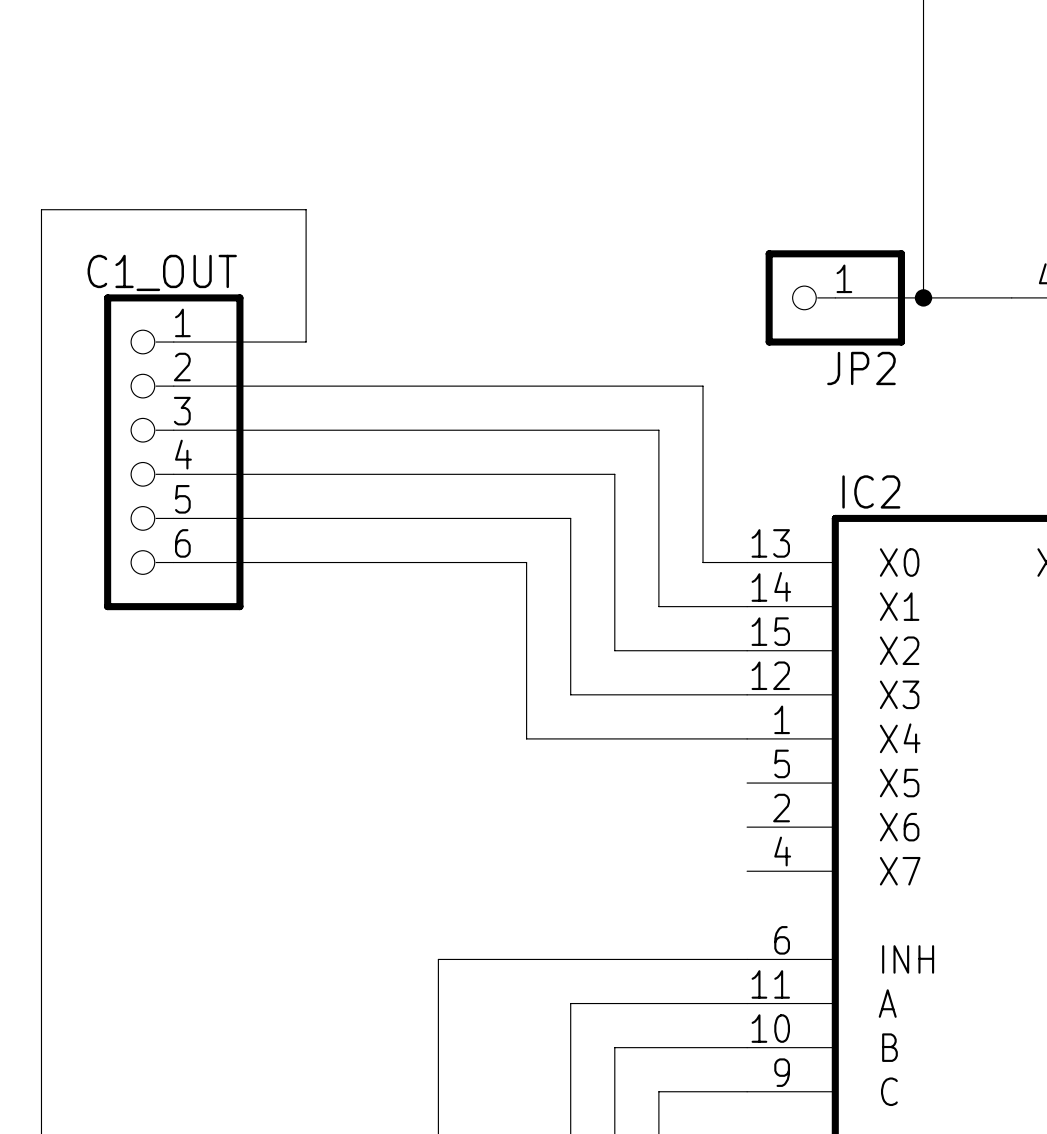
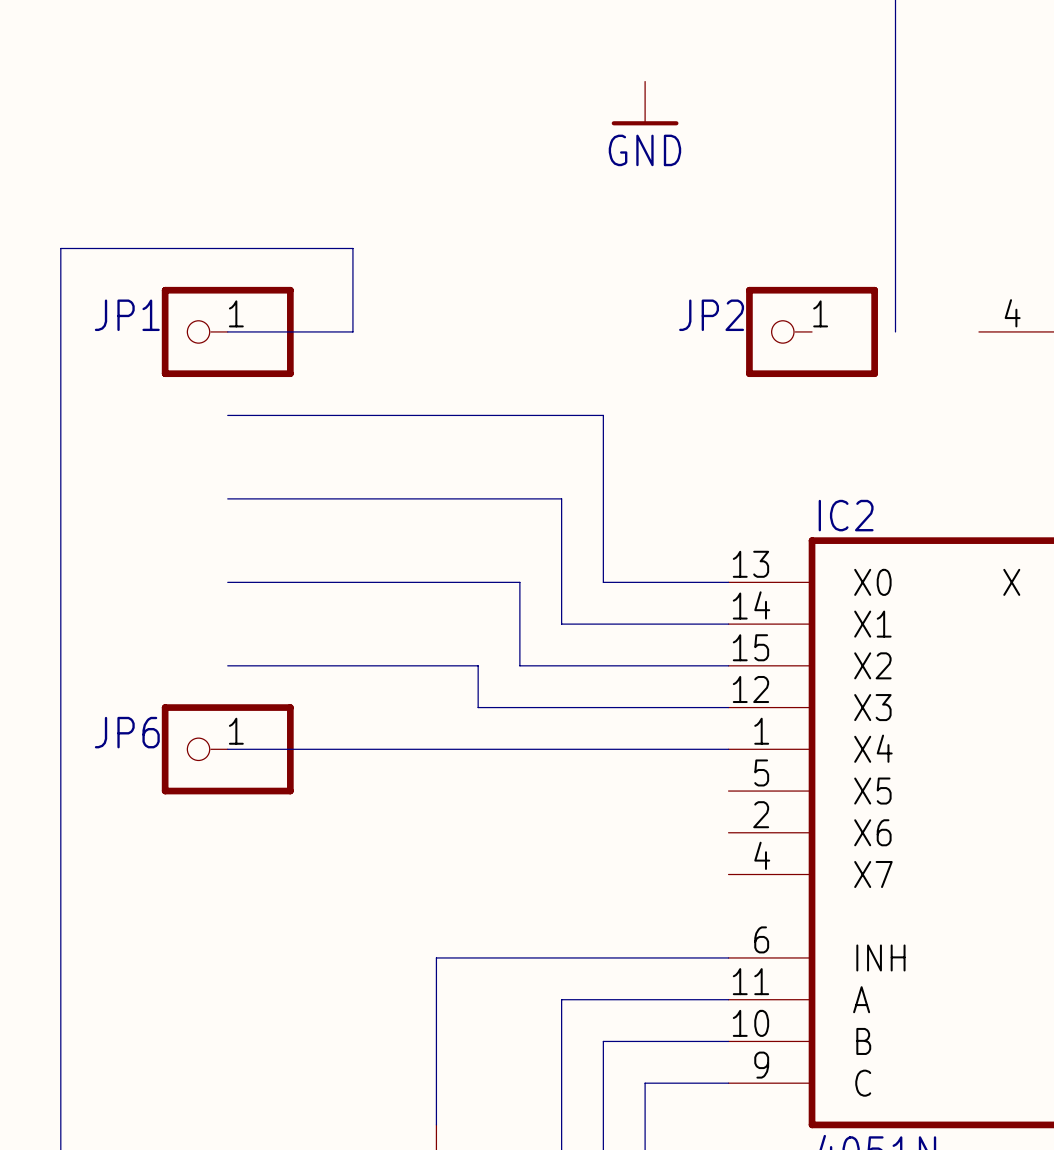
power symbol: none -> GND (645, 103)
wire: (306, 209) (306, 342) (173, 342) -> (311, 248) (352, 248) (352, 331) (227, 331)
JP1: none -> (227, 331)
wire: (835, 297) (1011, 297) -> none
junction: (923, 297) -> none
JP2 name position: JP2 (861, 368) -> JP2 (711, 315)
wire: (173, 386) (217, 386) -> none
wire: (614, 386) (703, 386) (703, 562) -> (603, 415) (603, 498)
wire: (173, 430) (658, 430) (658, 606) -> none
C1_OUT: (173, 452) -> none
wire: (173, 474) (217, 474) -> none
wire: (570, 474) (614, 474) -> (561, 498) (561, 540)
wire: (173, 518) (570, 518) -> none
wire: (173, 562) (217, 562) -> none
wire: (614, 562) (614, 650) -> (519, 665) (603, 665)
wire: none -> (603, 582) (686, 582)
wire: (570, 606) (570, 694) -> (561, 624) (645, 624)
wire: none -> (227, 665) (478, 665) (478, 707) (561, 707)
wire: (526, 650) (526, 738) -> (227, 749) (519, 749)
JP6: none -> (227, 749)

